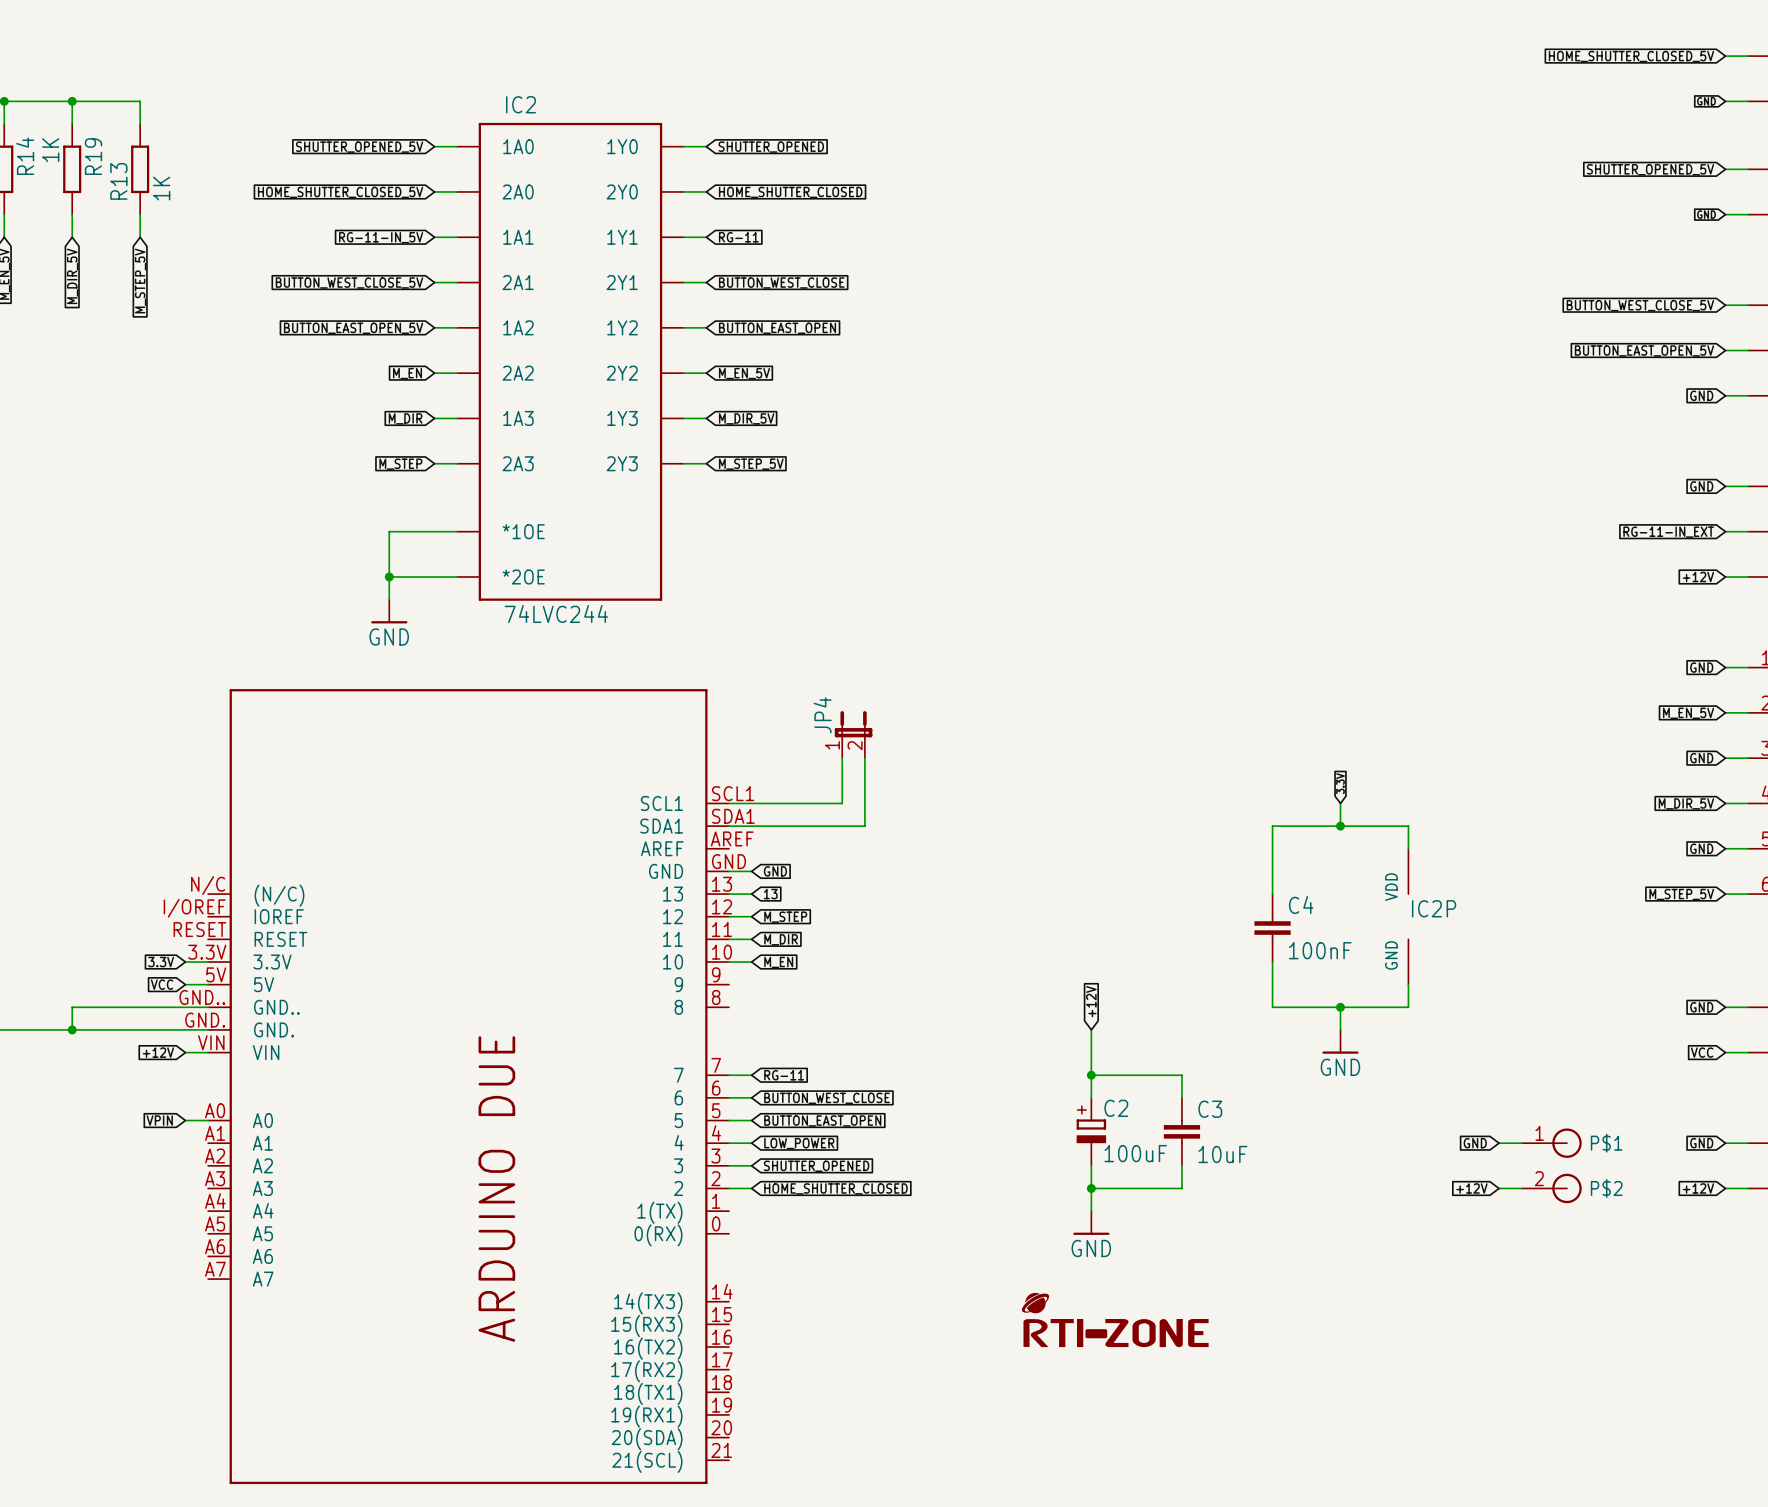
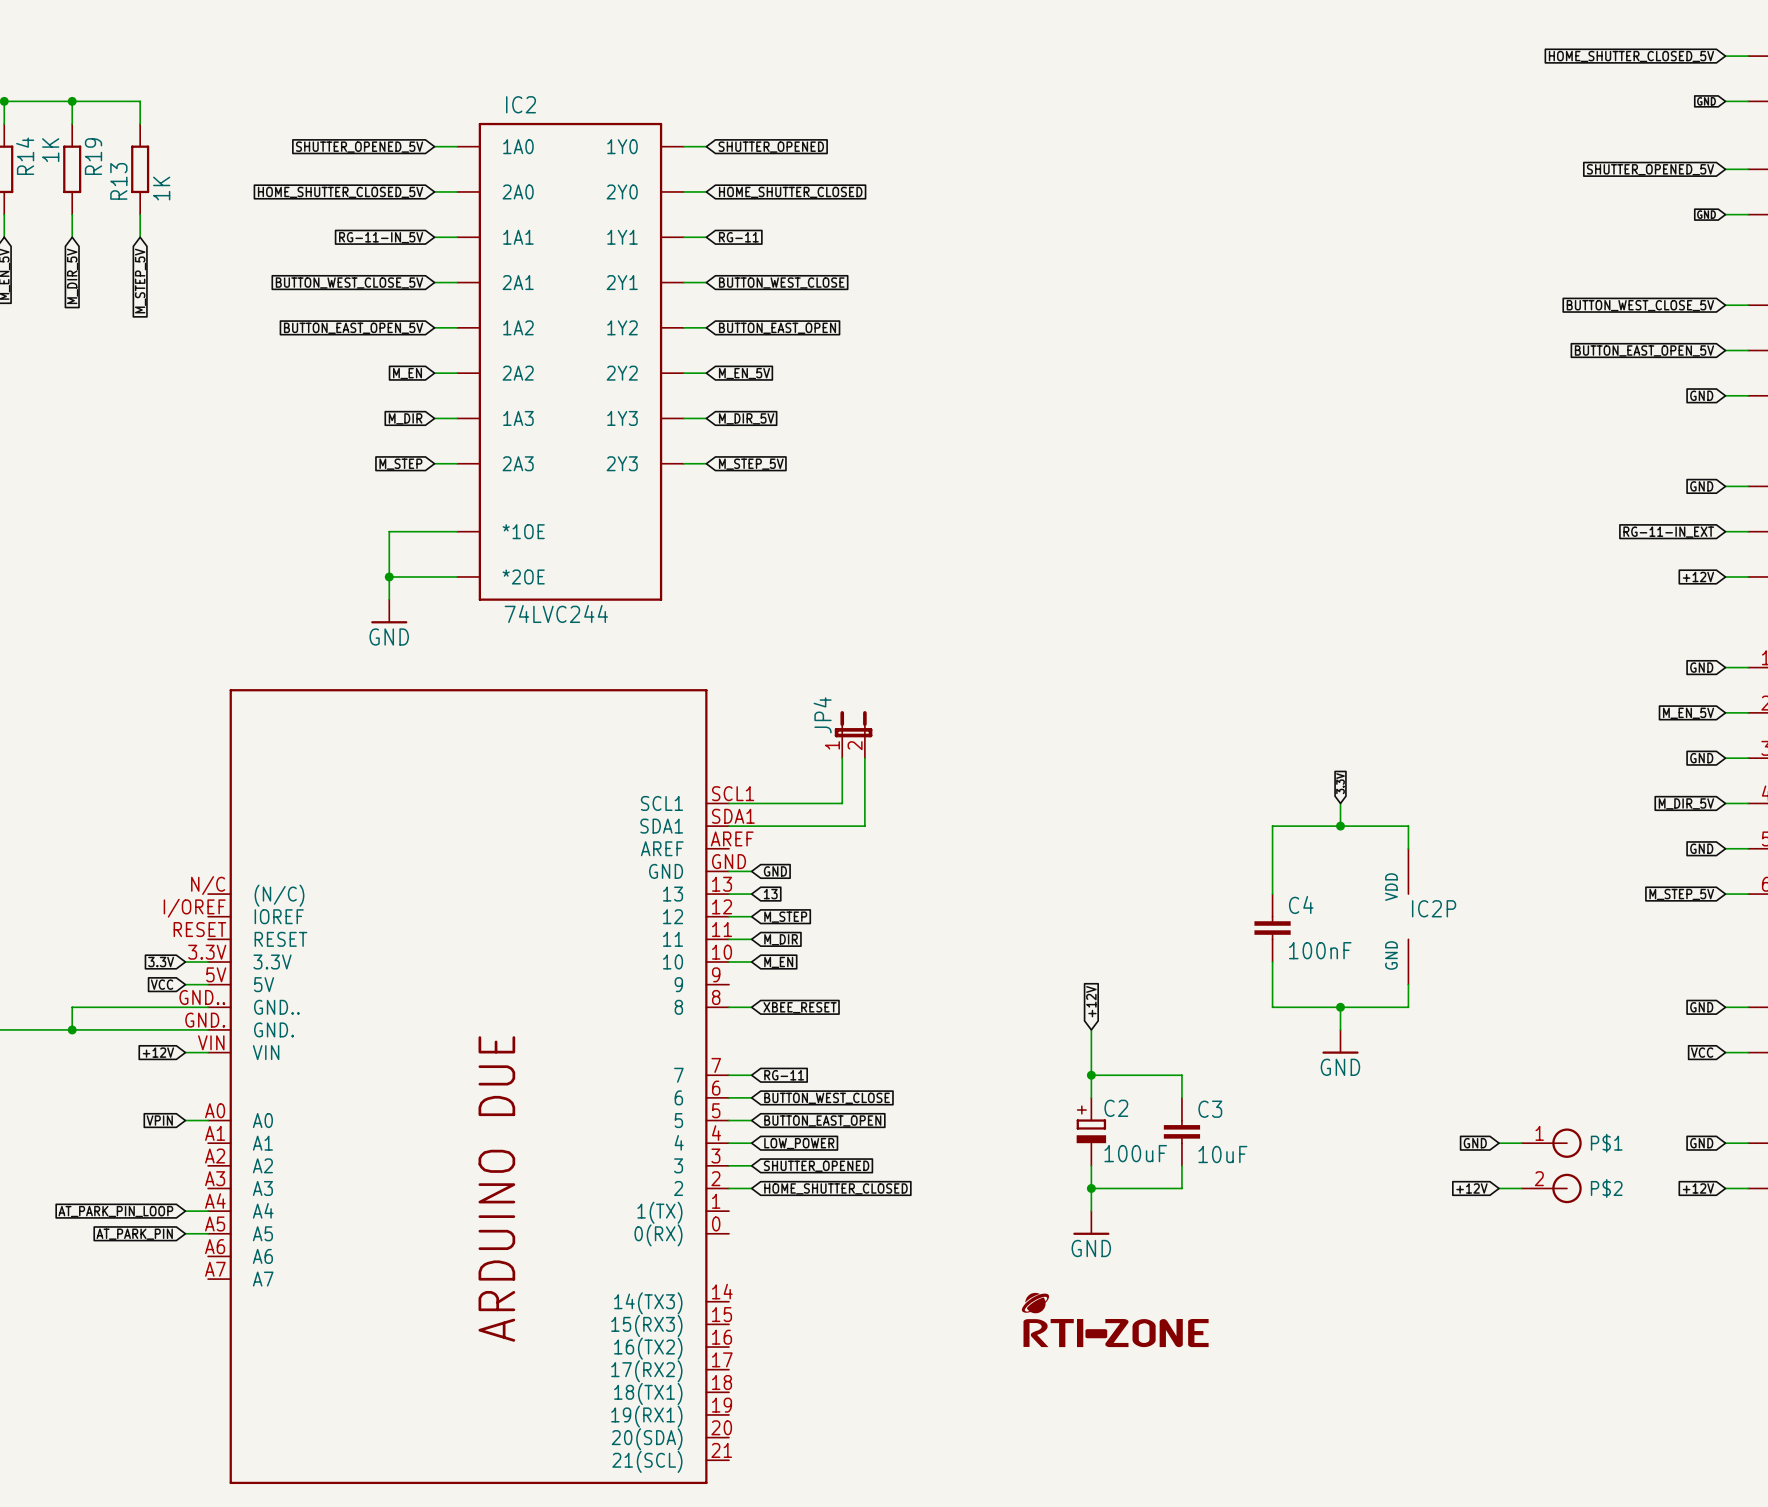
wire: none -> (729, 1007) (751, 1007)
global label: none -> XBEE_RESET (800, 1007)
global label: none -> AT_PARK_PIN_LOOP (115, 1211)
wire: none -> (185, 1211) (208, 1211)
wire: none -> (185, 1233) (208, 1233)
global label: none -> AT_PARK_PIN (134, 1234)

